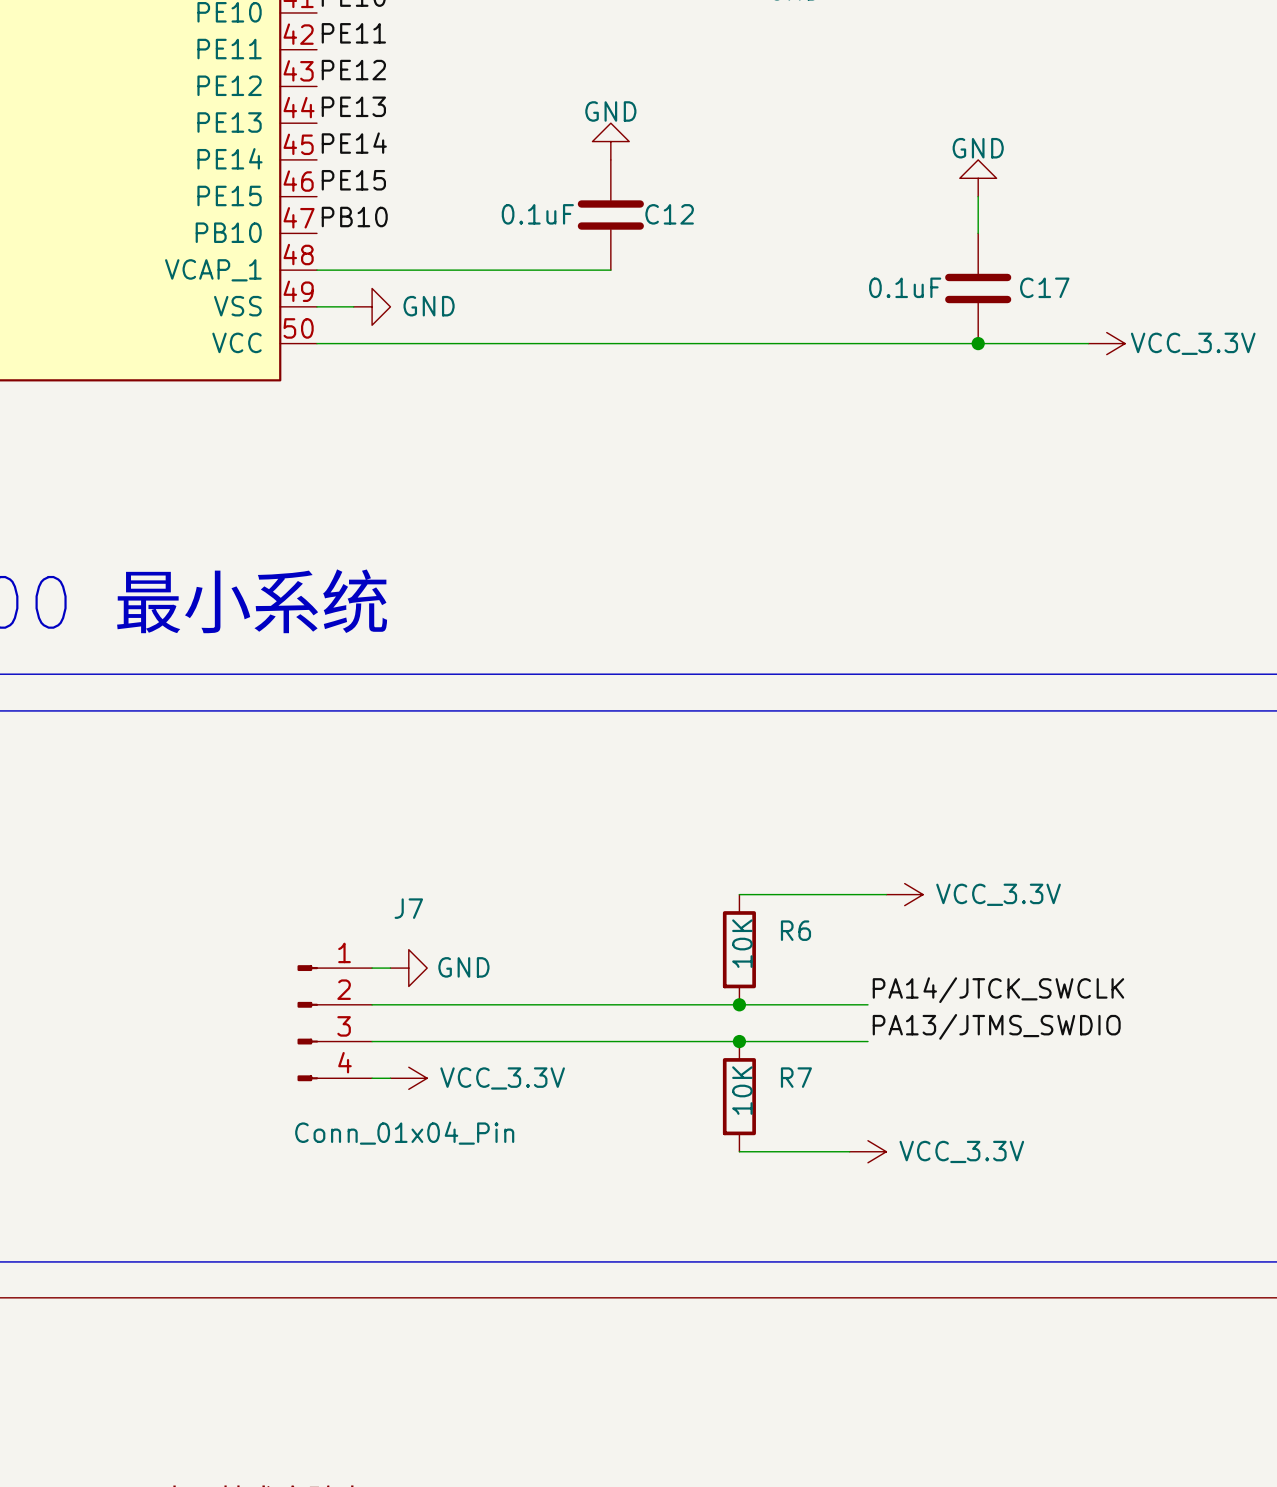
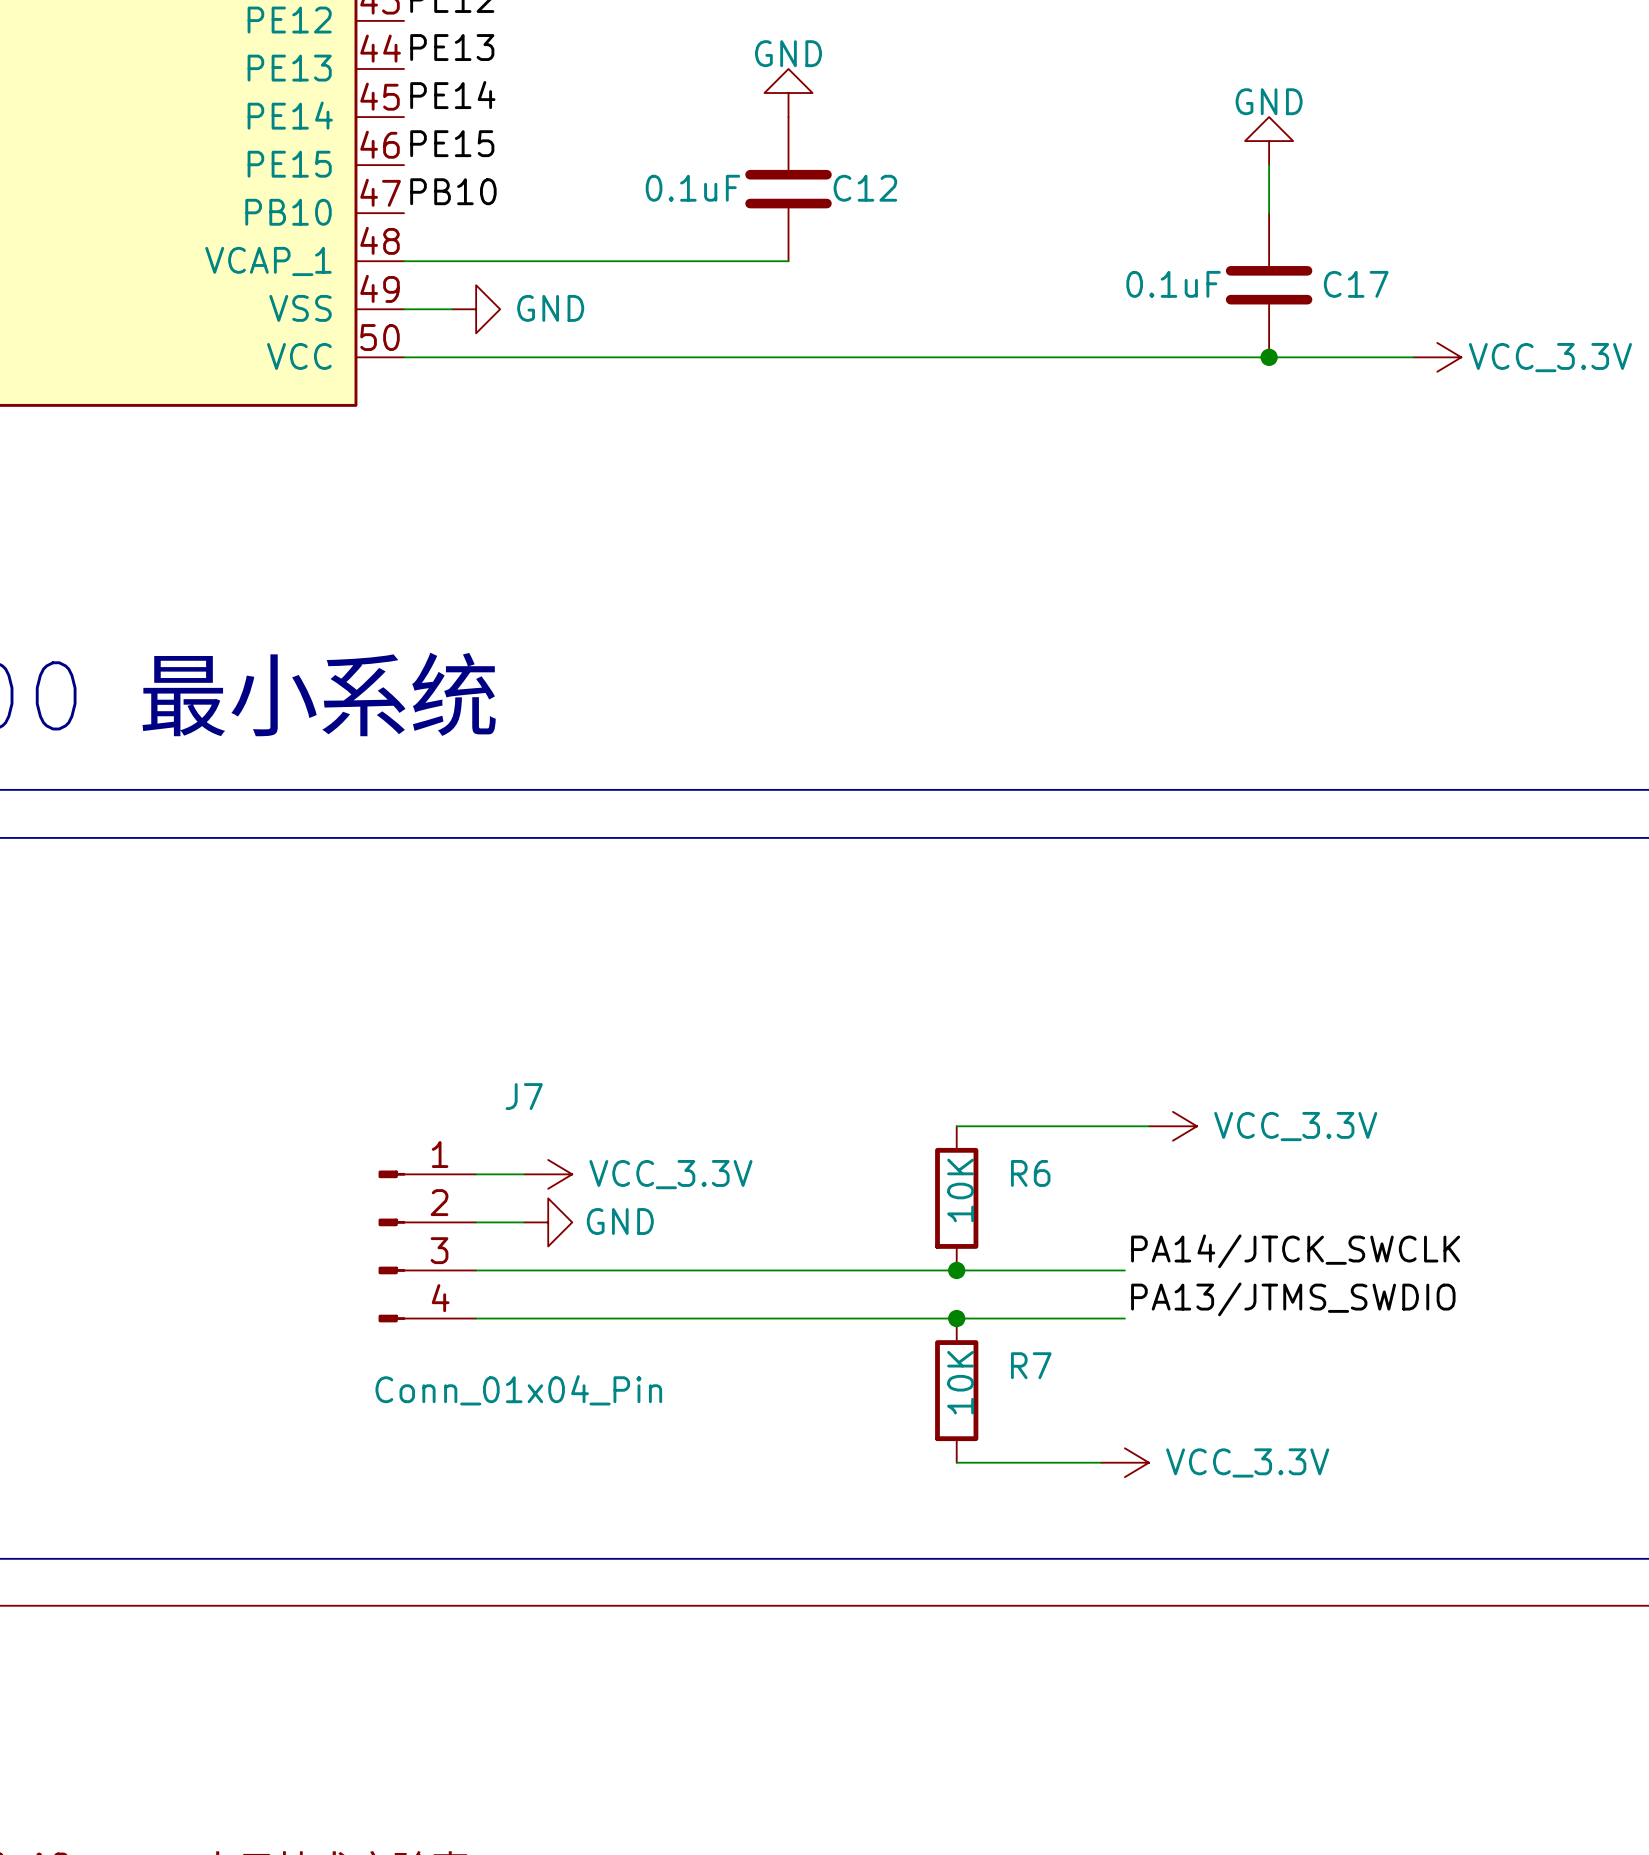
wire: (739, 894) (886, 894) -> (956, 1126) (1148, 1126)
power symbol position: VCC_3.3V (904, 894) -> VCC_3.3V (1172, 1126)
R6 position: (739, 949) -> (956, 1198)
power symbol position: GND (408, 968) -> GND (548, 1222)
label: PA14/JTCK_SWCLK (998, 990) -> none
wire: (408, 1004) (867, 1004) -> none
junction position: (739, 1004) -> (956, 1318)
label: PA13/JTMS_SWDIO (996, 1026) -> PA14/JTCK_SWCLK (1295, 1251)
label: none -> PA13/JTMS_SWDIO (1293, 1299)
wire: none -> (500, 1318) (1124, 1318)
power symbol position: VCC_3.3V (408, 1078) -> VCC_3.3V (548, 1174)
R7 position: (739, 1096) -> (956, 1390)
wire: (739, 1151) (849, 1151) -> (956, 1462) (1100, 1462)
power symbol position: VCC_3.3V (867, 1151) -> VCC_3.3V (1124, 1462)

